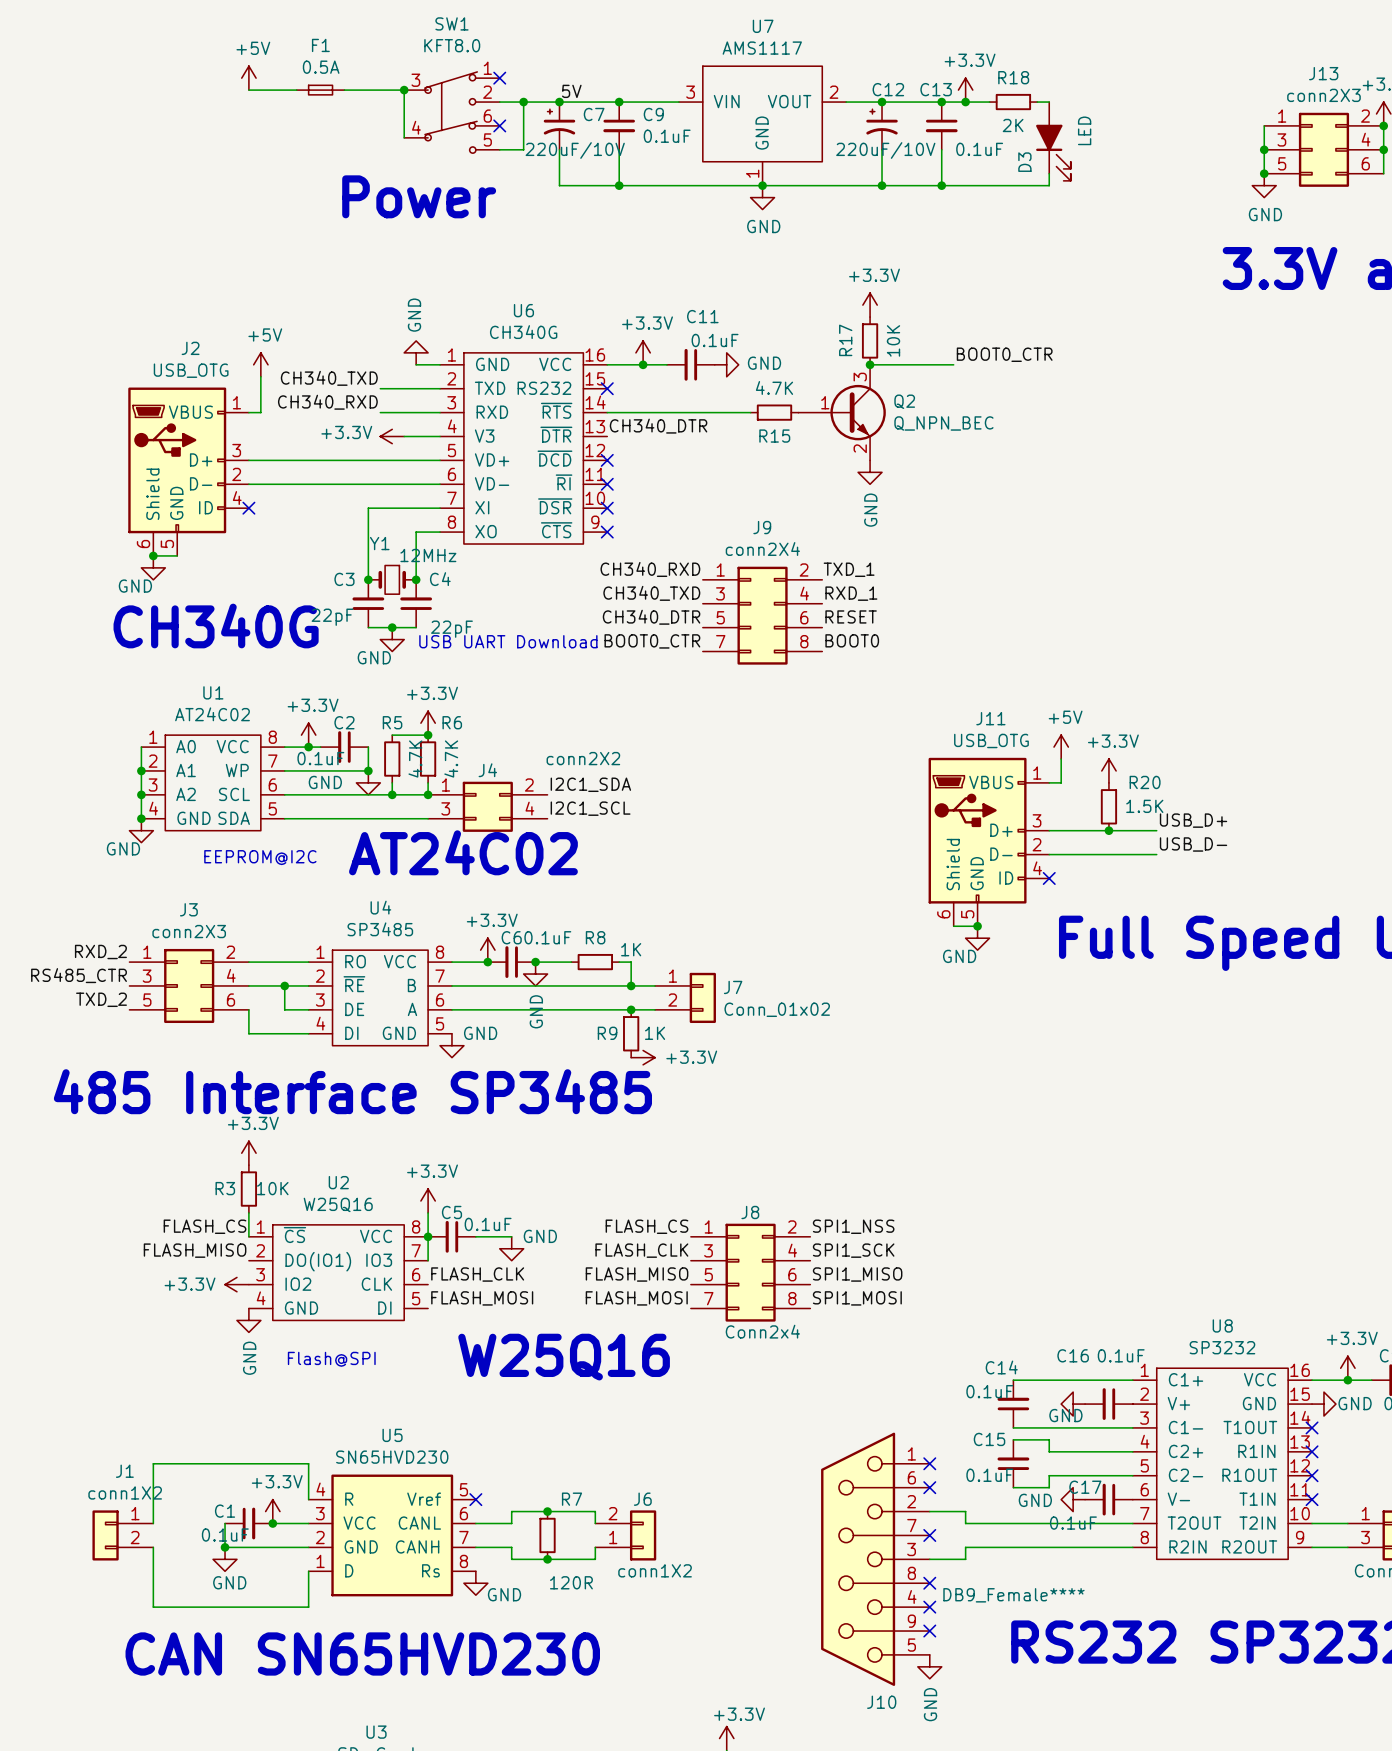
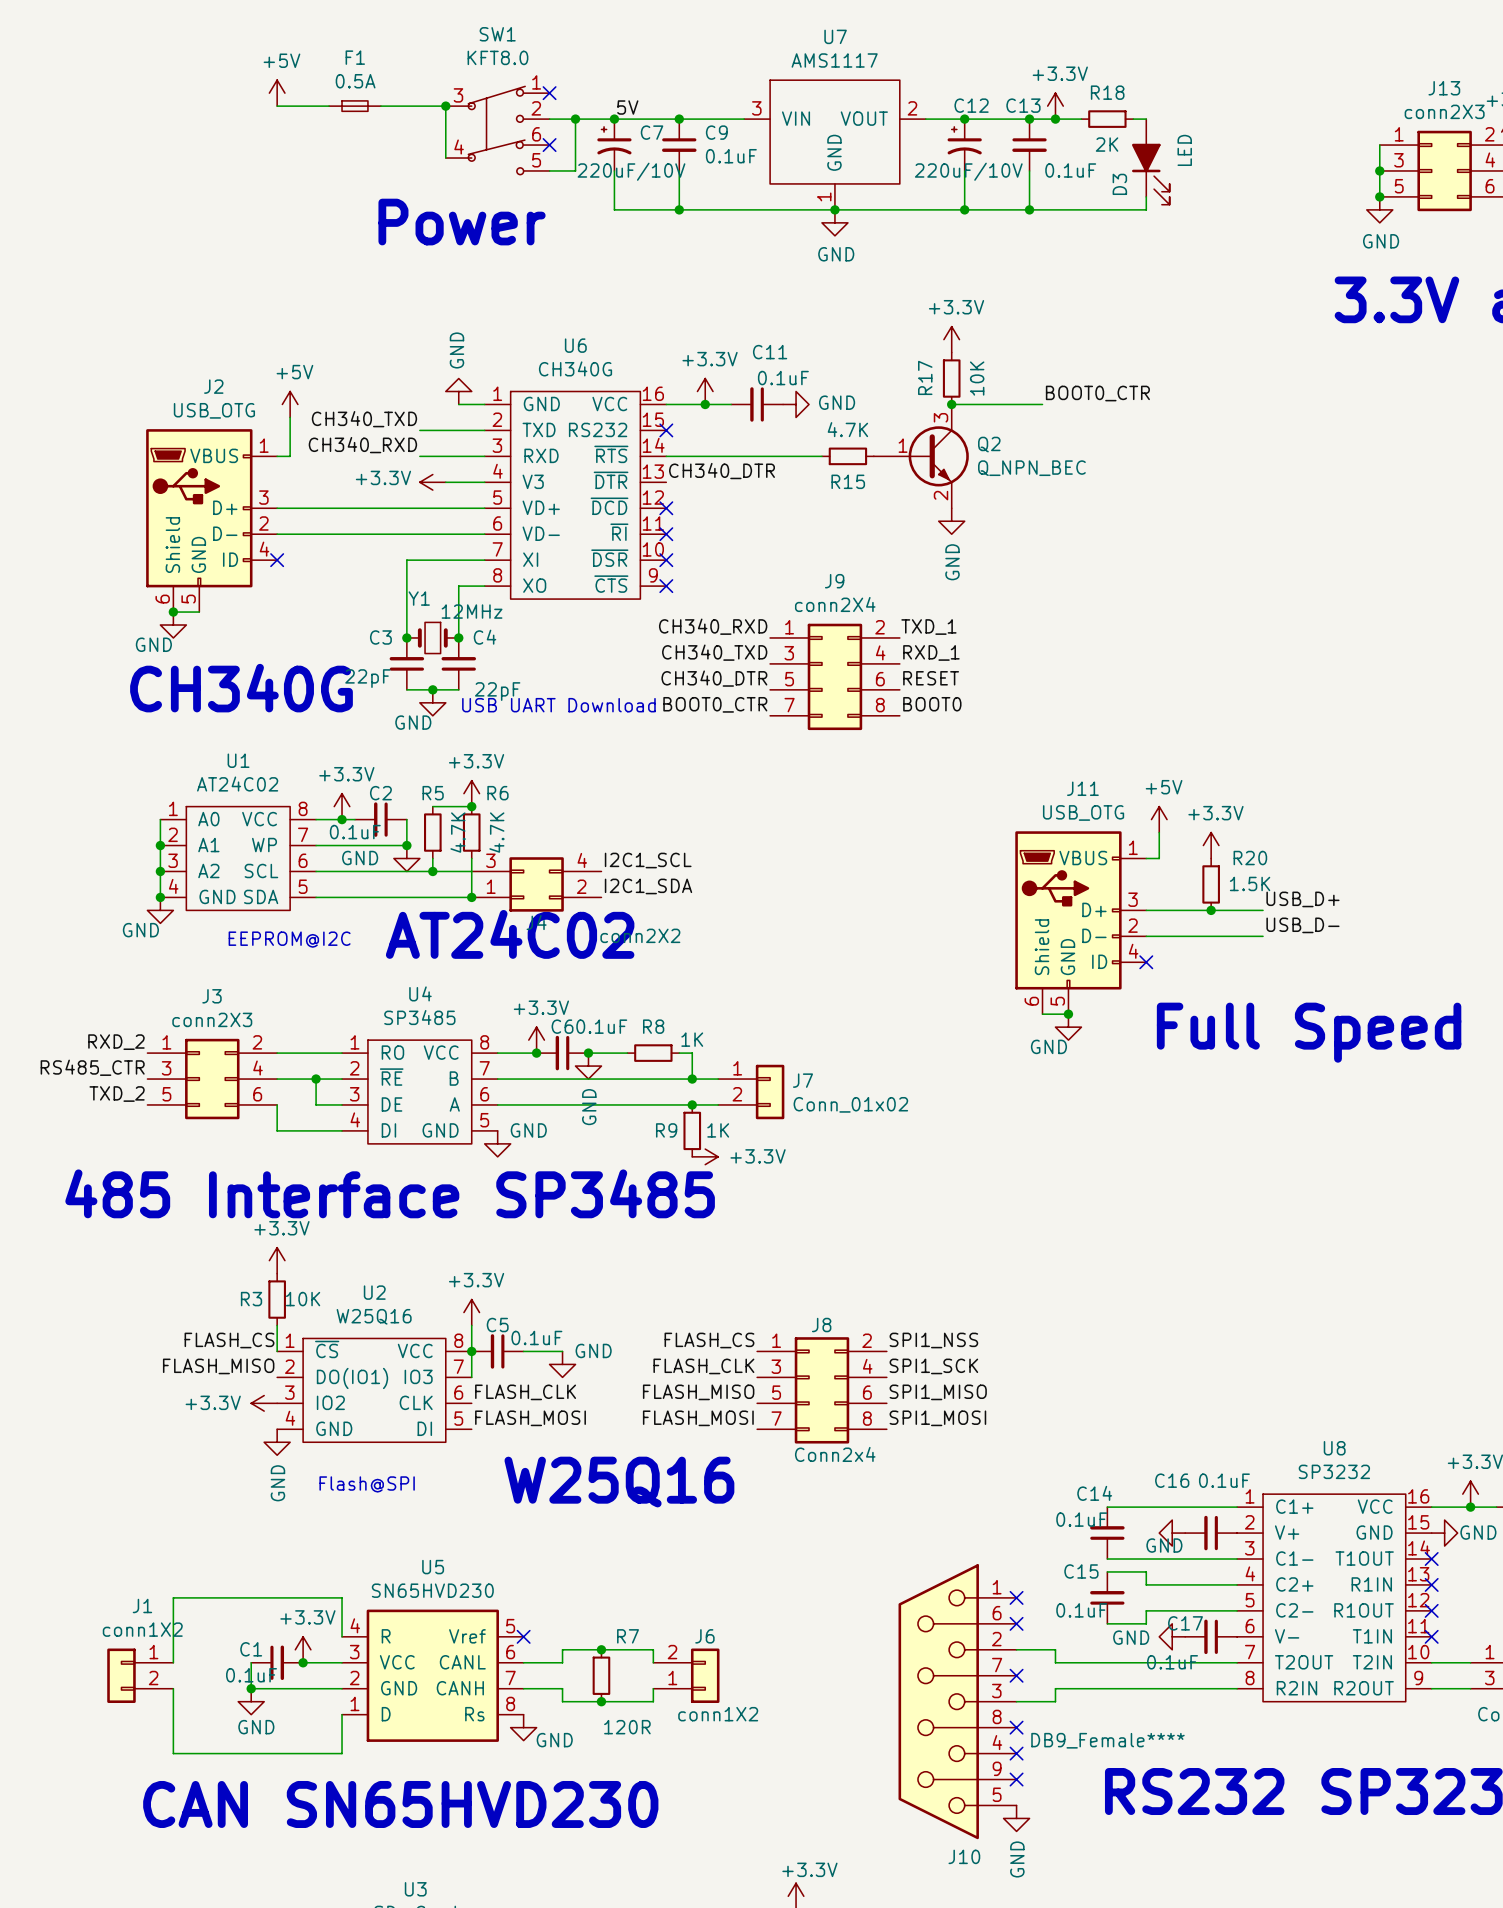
label: I2C1_SDA (590, 784) -> I2C1_SCL (648, 860)
wire: none -> (471, 871) (471, 897)
junction position: (428, 794) -> (471, 897)
J4 flip: as is (487, 806) -> up-down (536, 884)
label: I2C1_SCL (590, 808) -> I2C1_SDA (648, 886)

